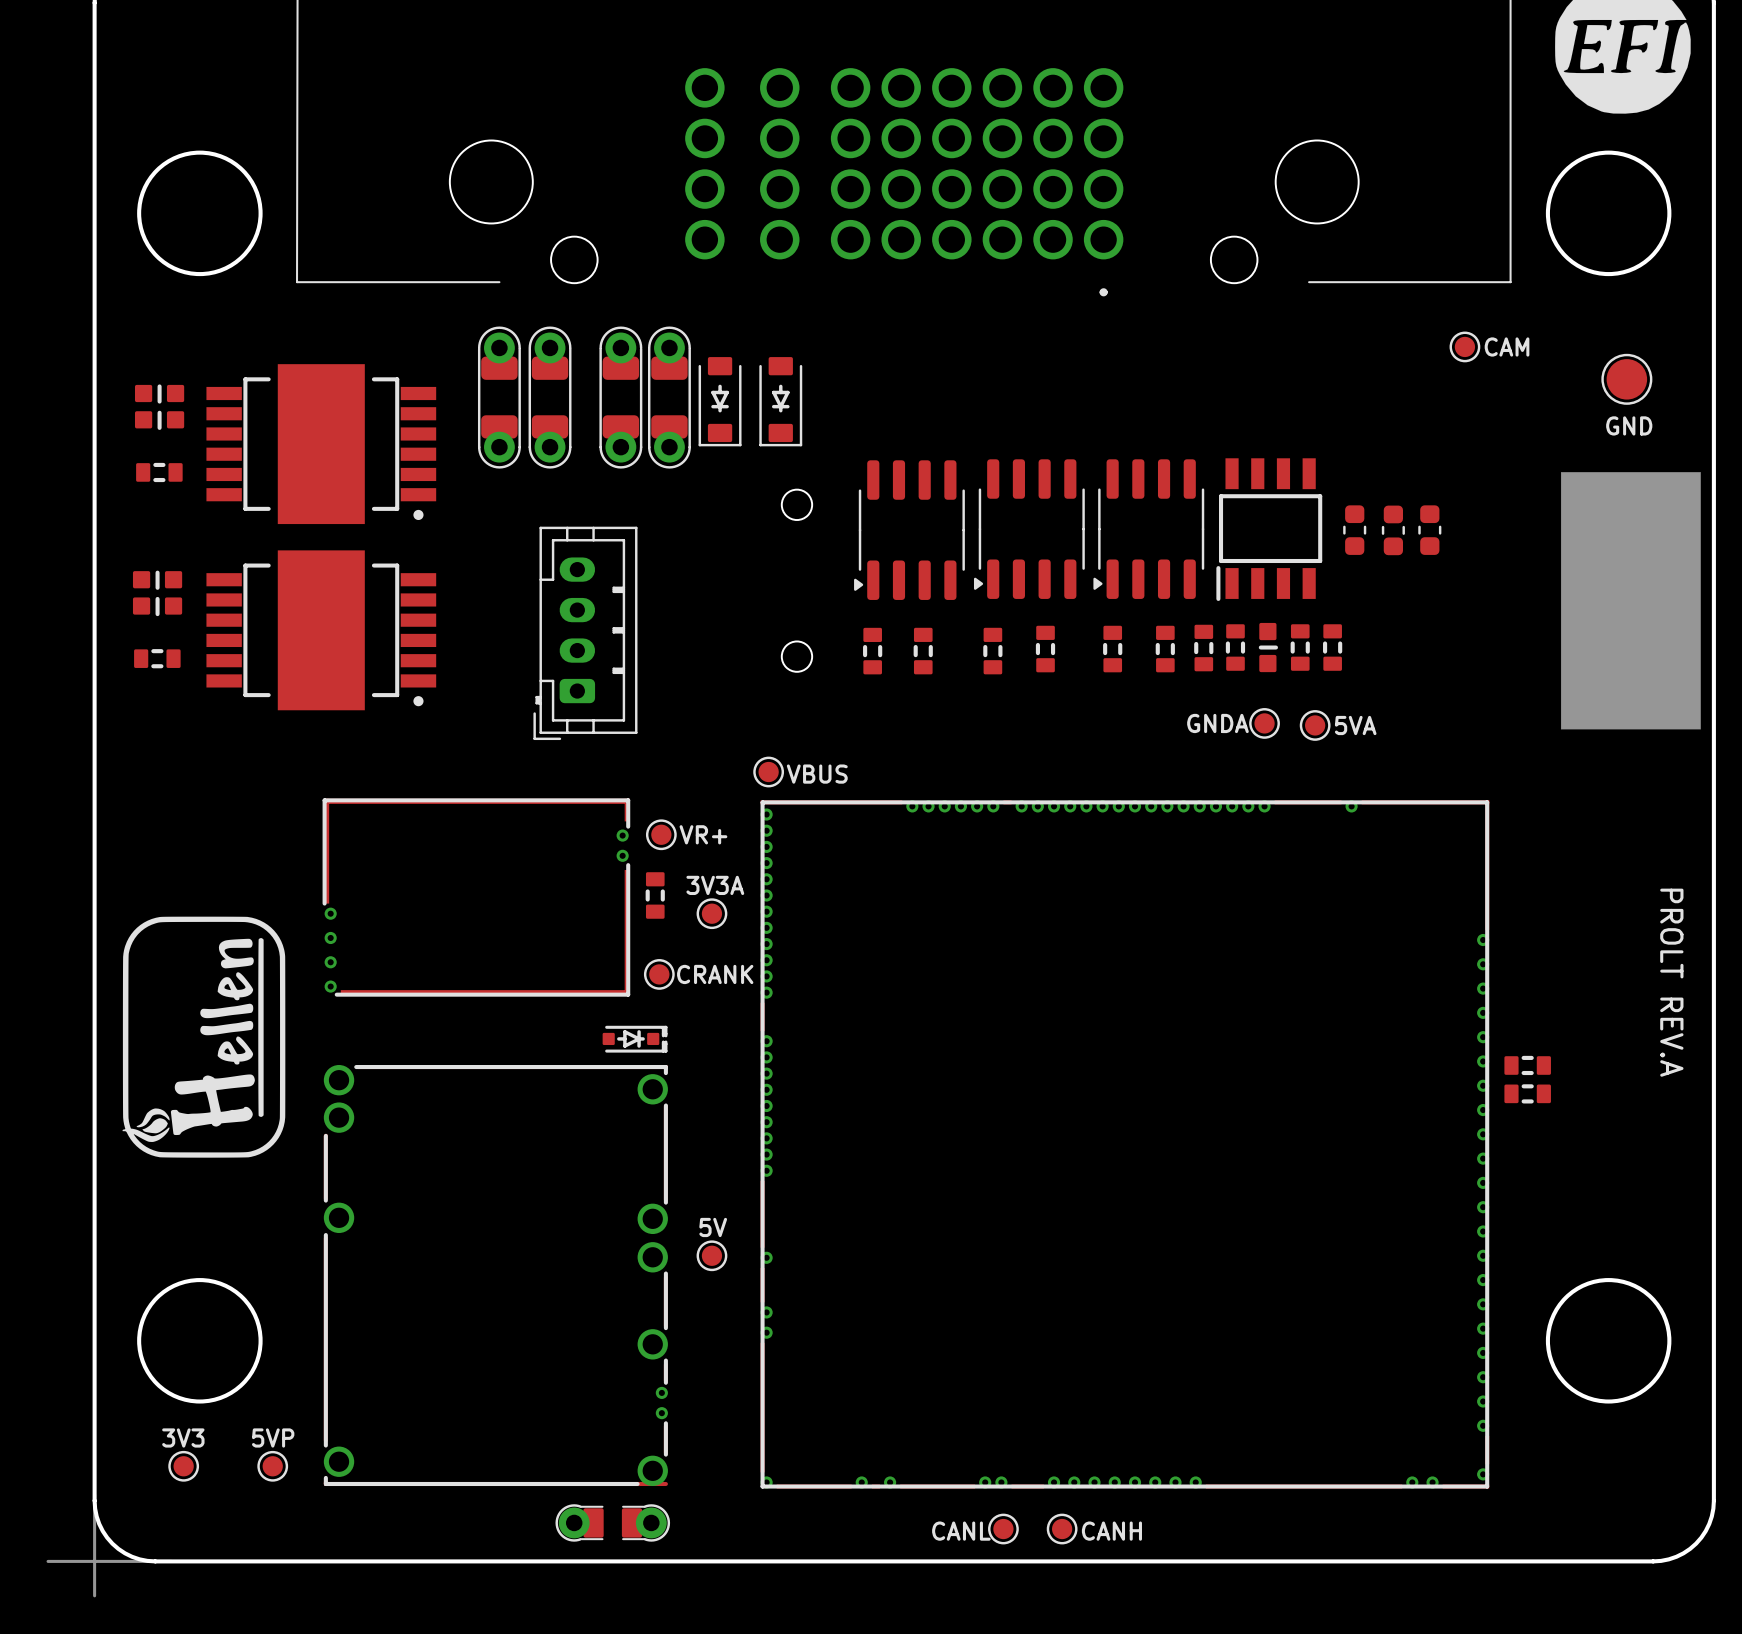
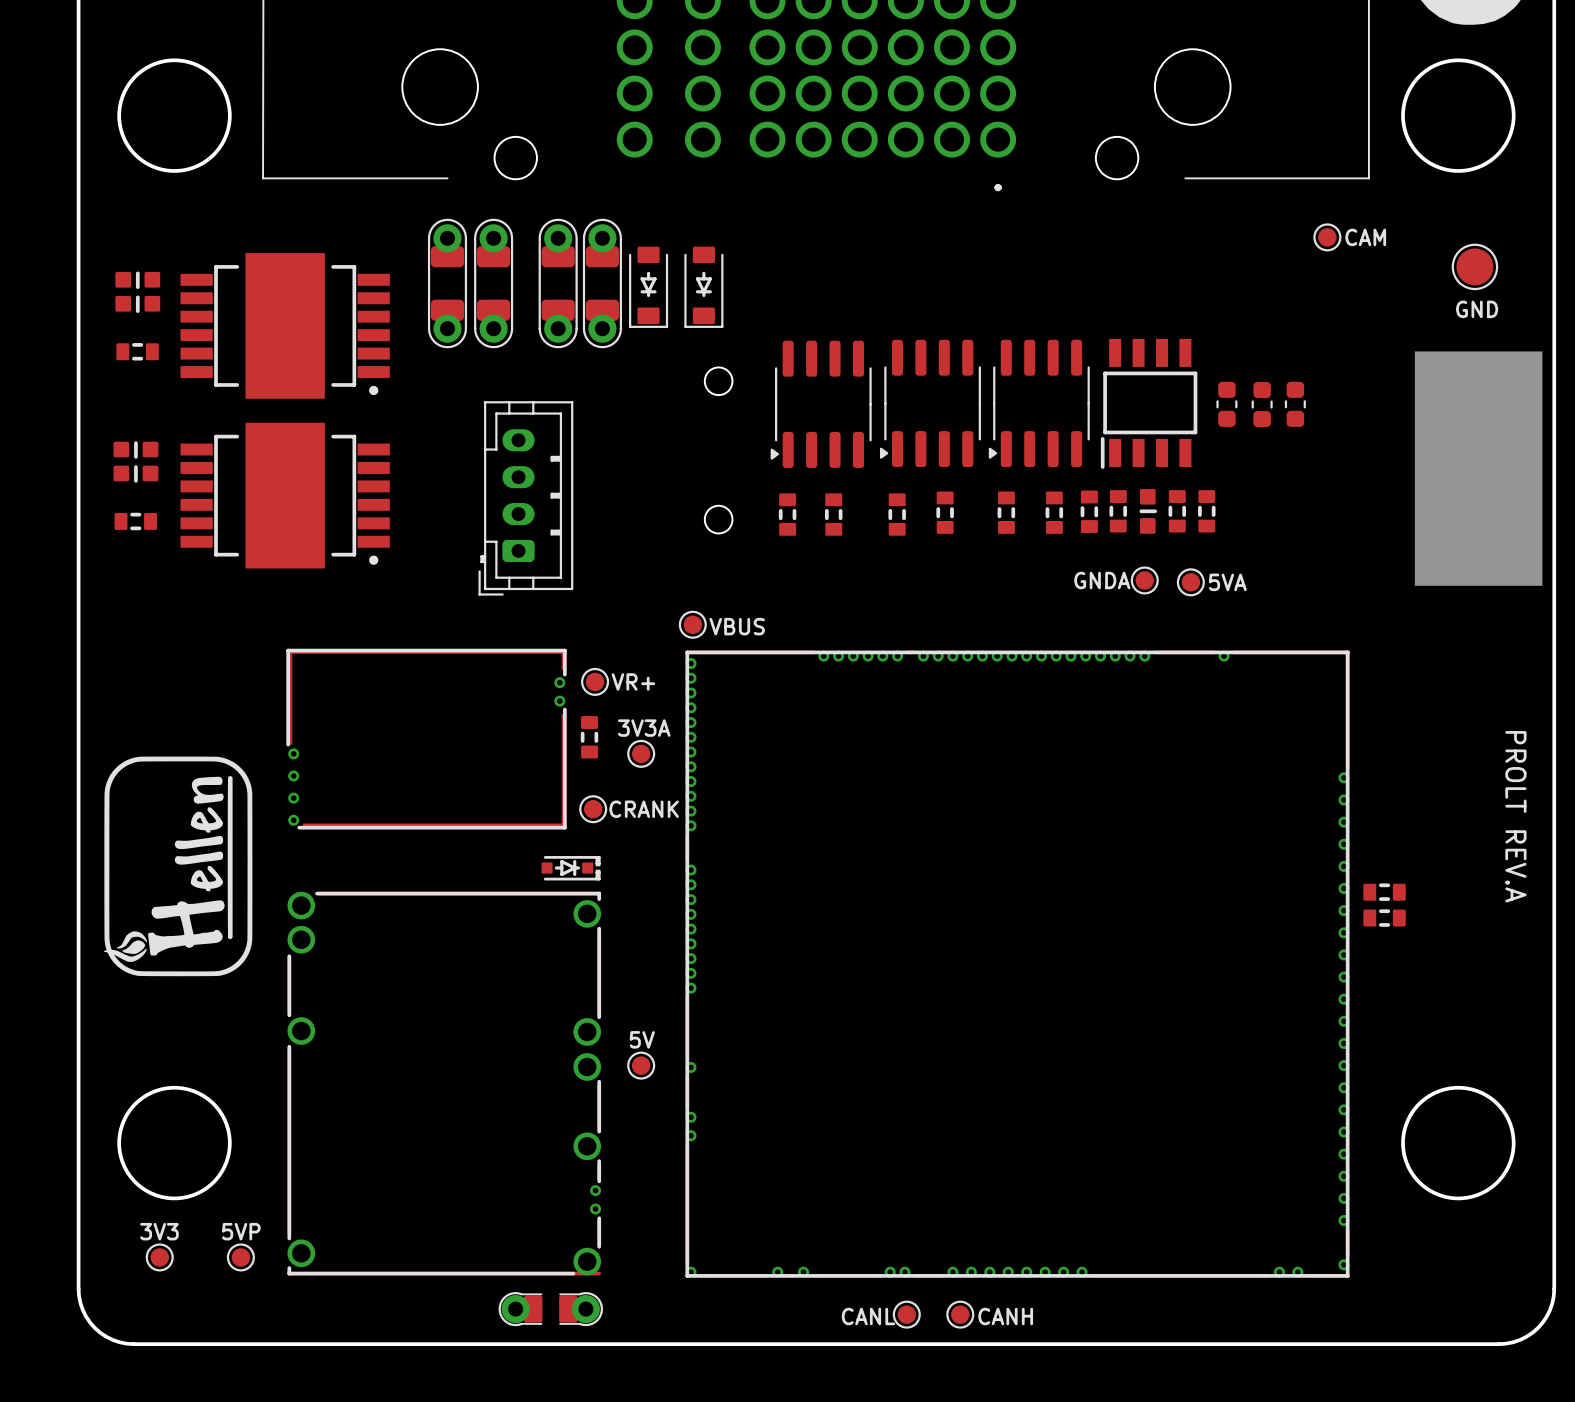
line: (94, 1494) (94, 1595) -> none
line: (48, 1561) (171, 1561) -> none

